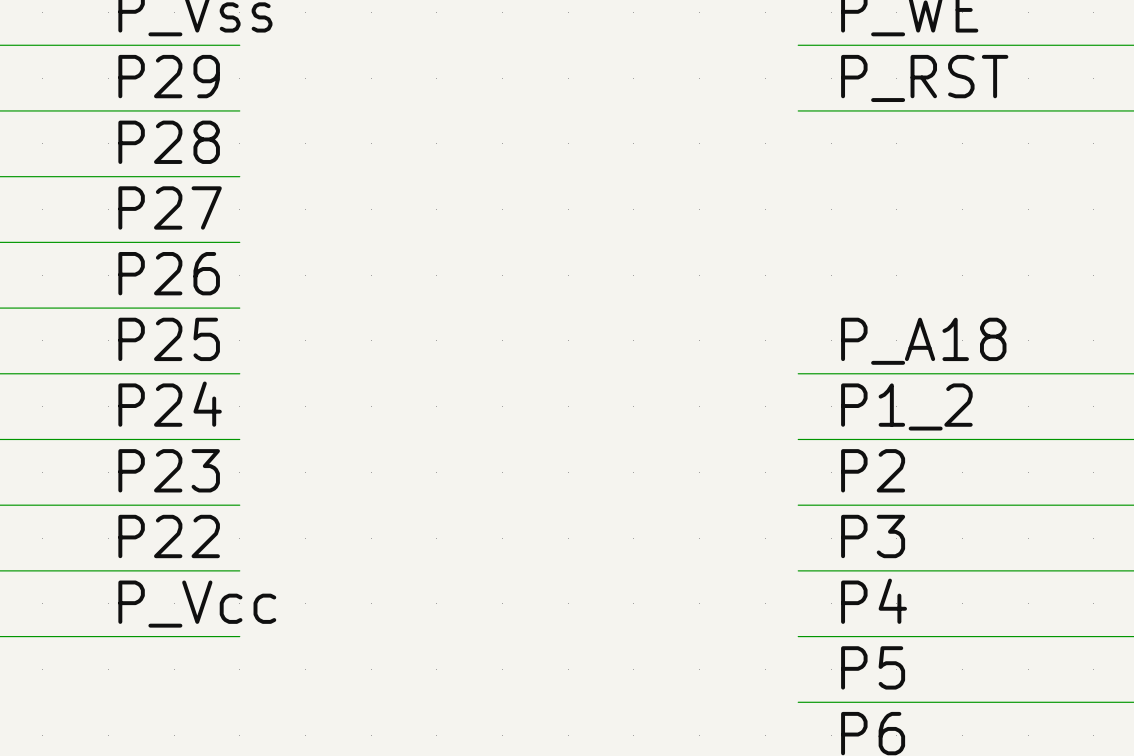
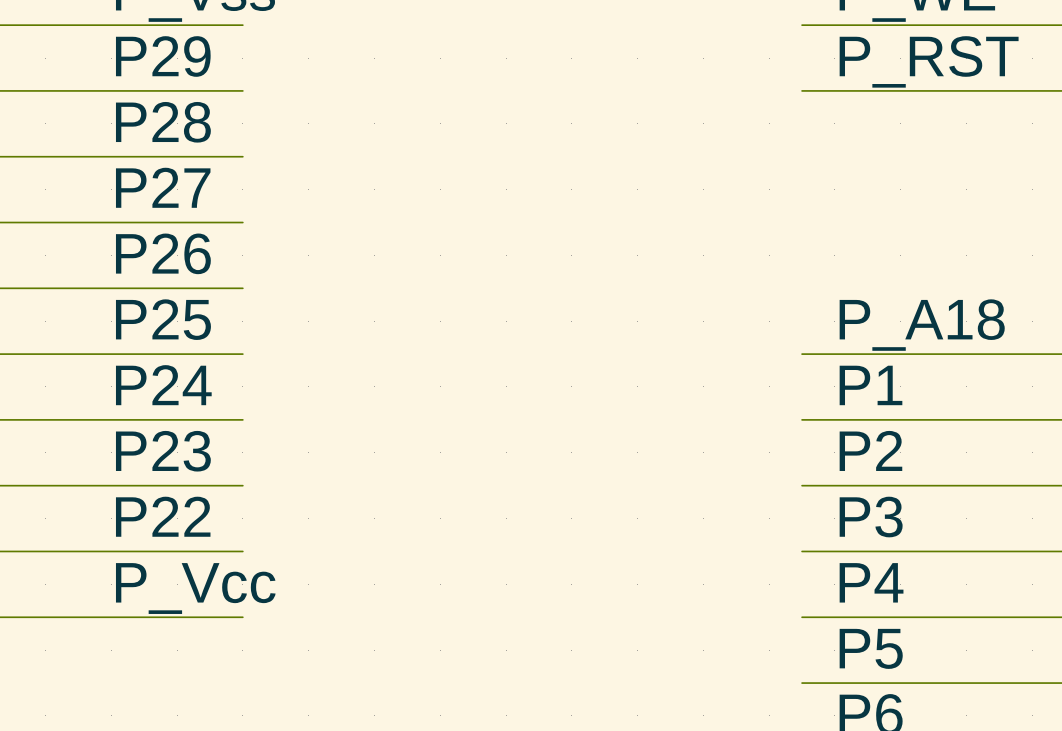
label: P1_2 (906, 406) -> P1 (870, 385)

